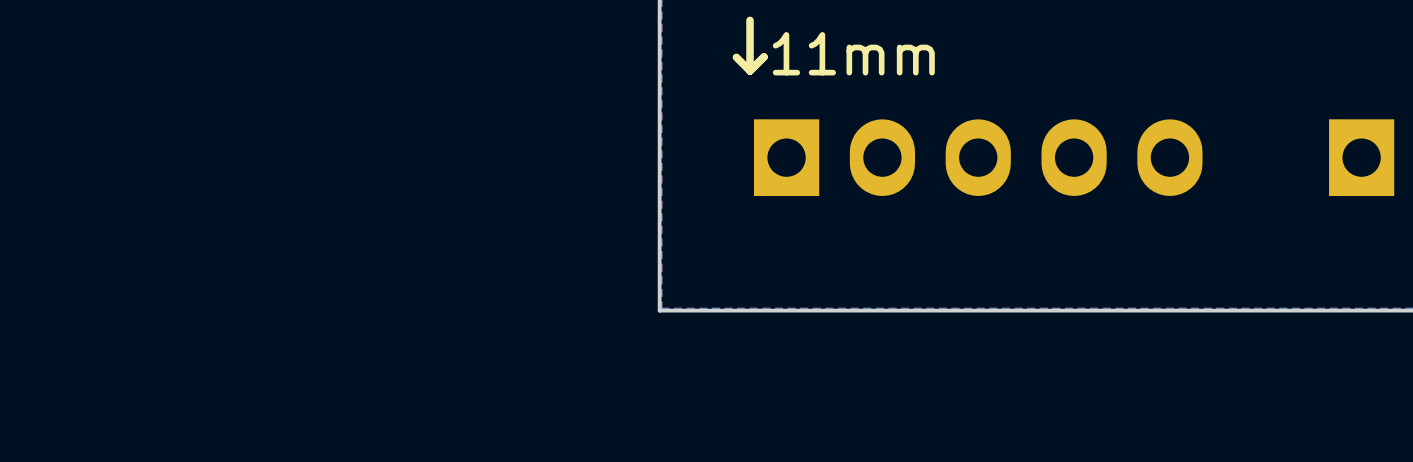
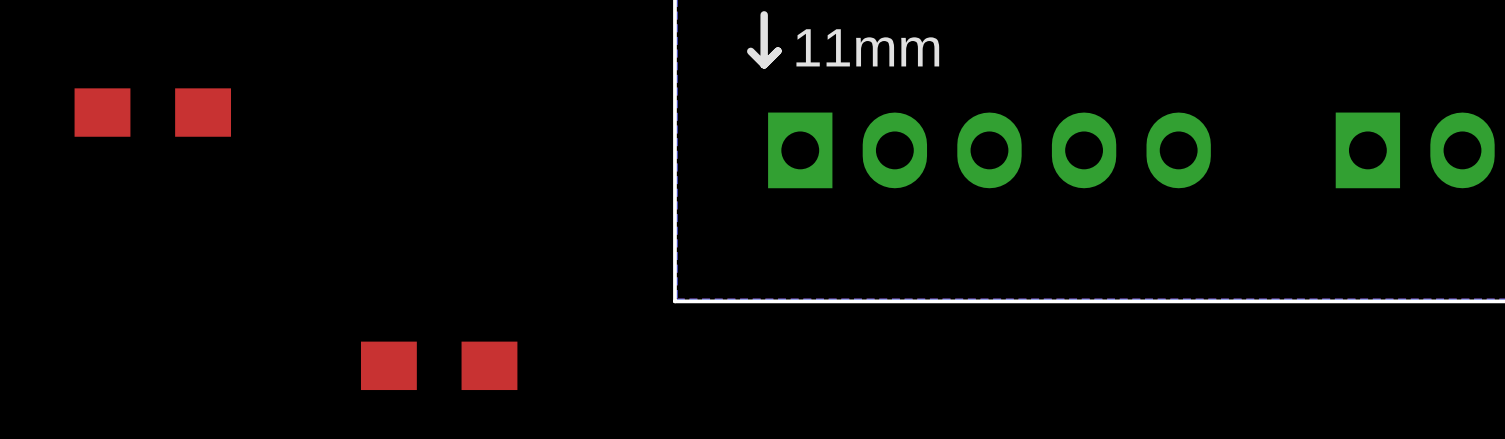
part: none -> (152, 112)
part: none -> (439, 365)

